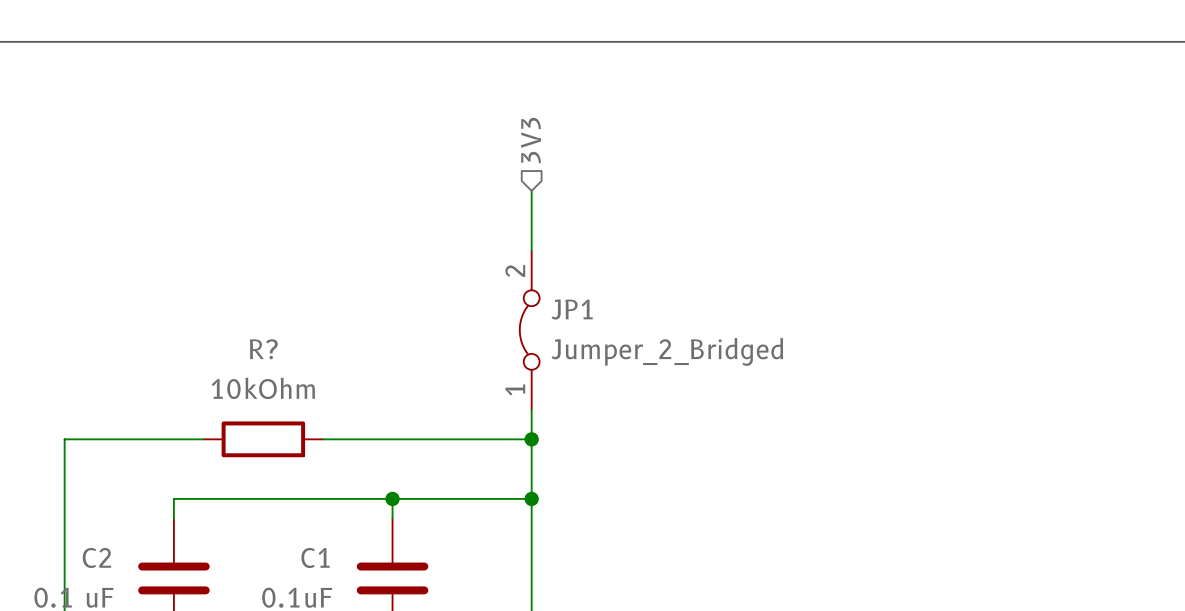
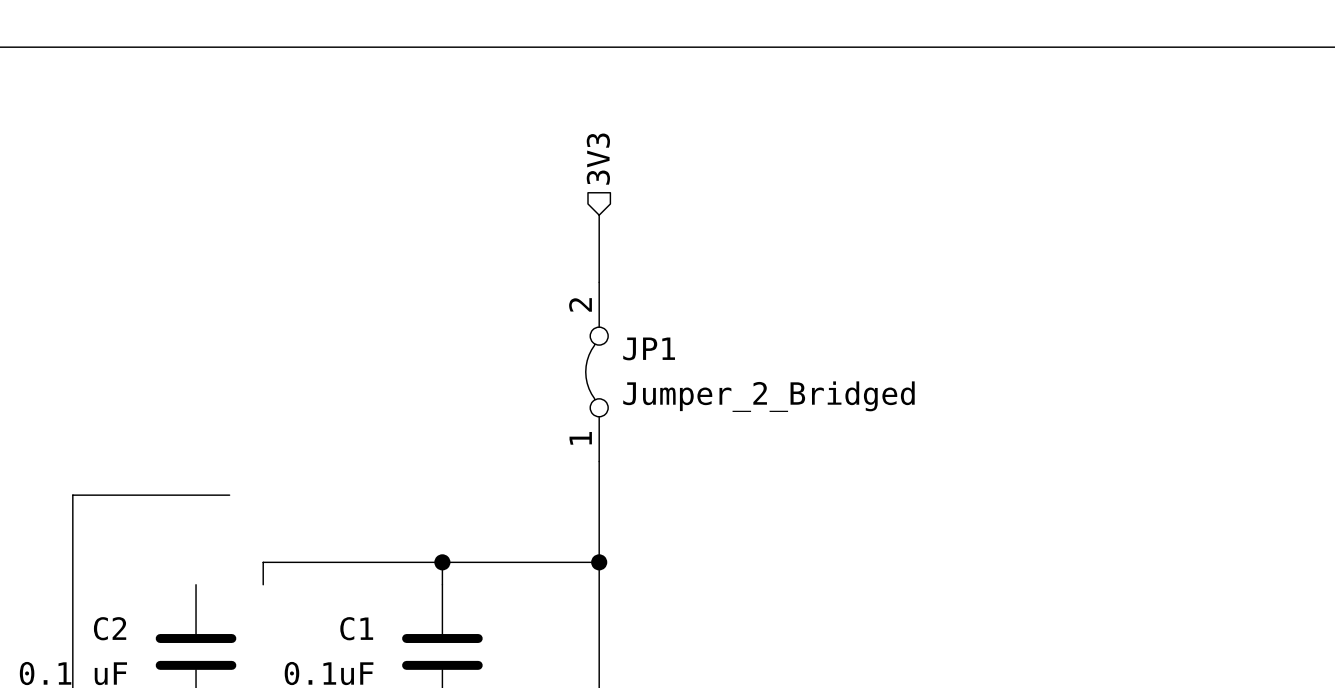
R?: 10kOhm (263, 439) -> none
wire: (322, 439) (531, 439) -> none
junction: (531, 439) -> none
wire: (233, 498) (173, 498) (173, 518) -> (263, 562) (263, 584)

